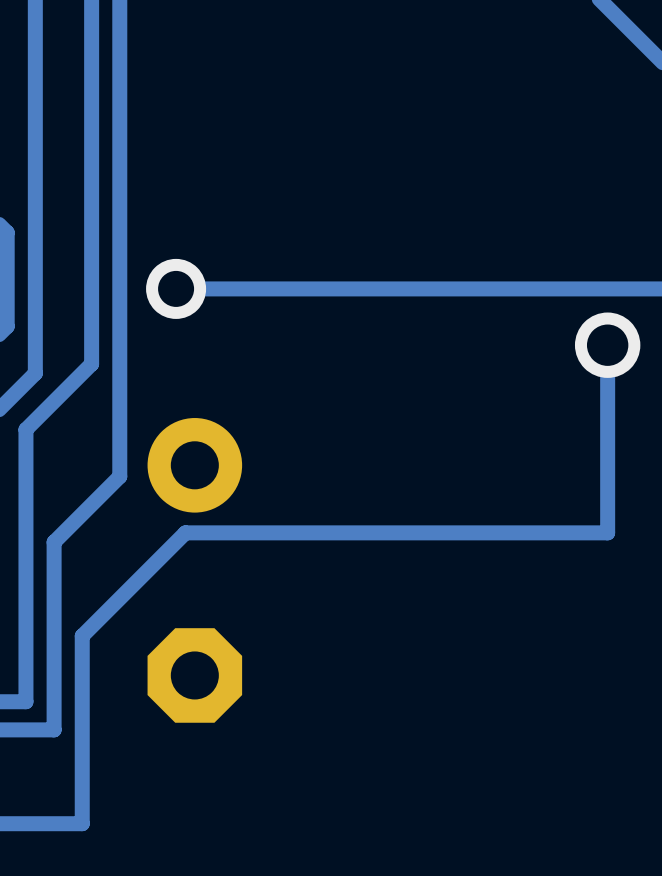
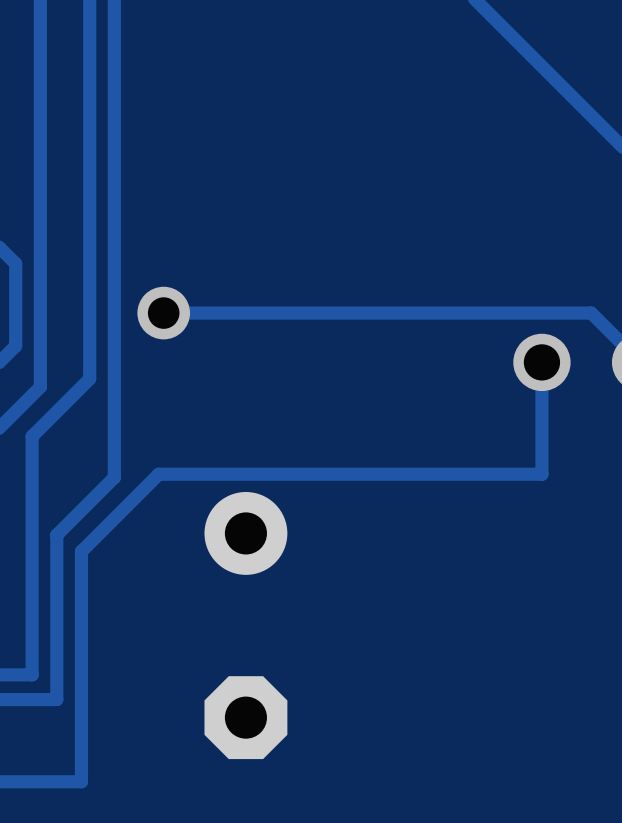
track: (607, 472) (607, 532) (185, 532) (82, 636) -> (541, 474) (158, 474) (81, 551) (81, 617)
part position: (194, 570) -> (245, 625)

